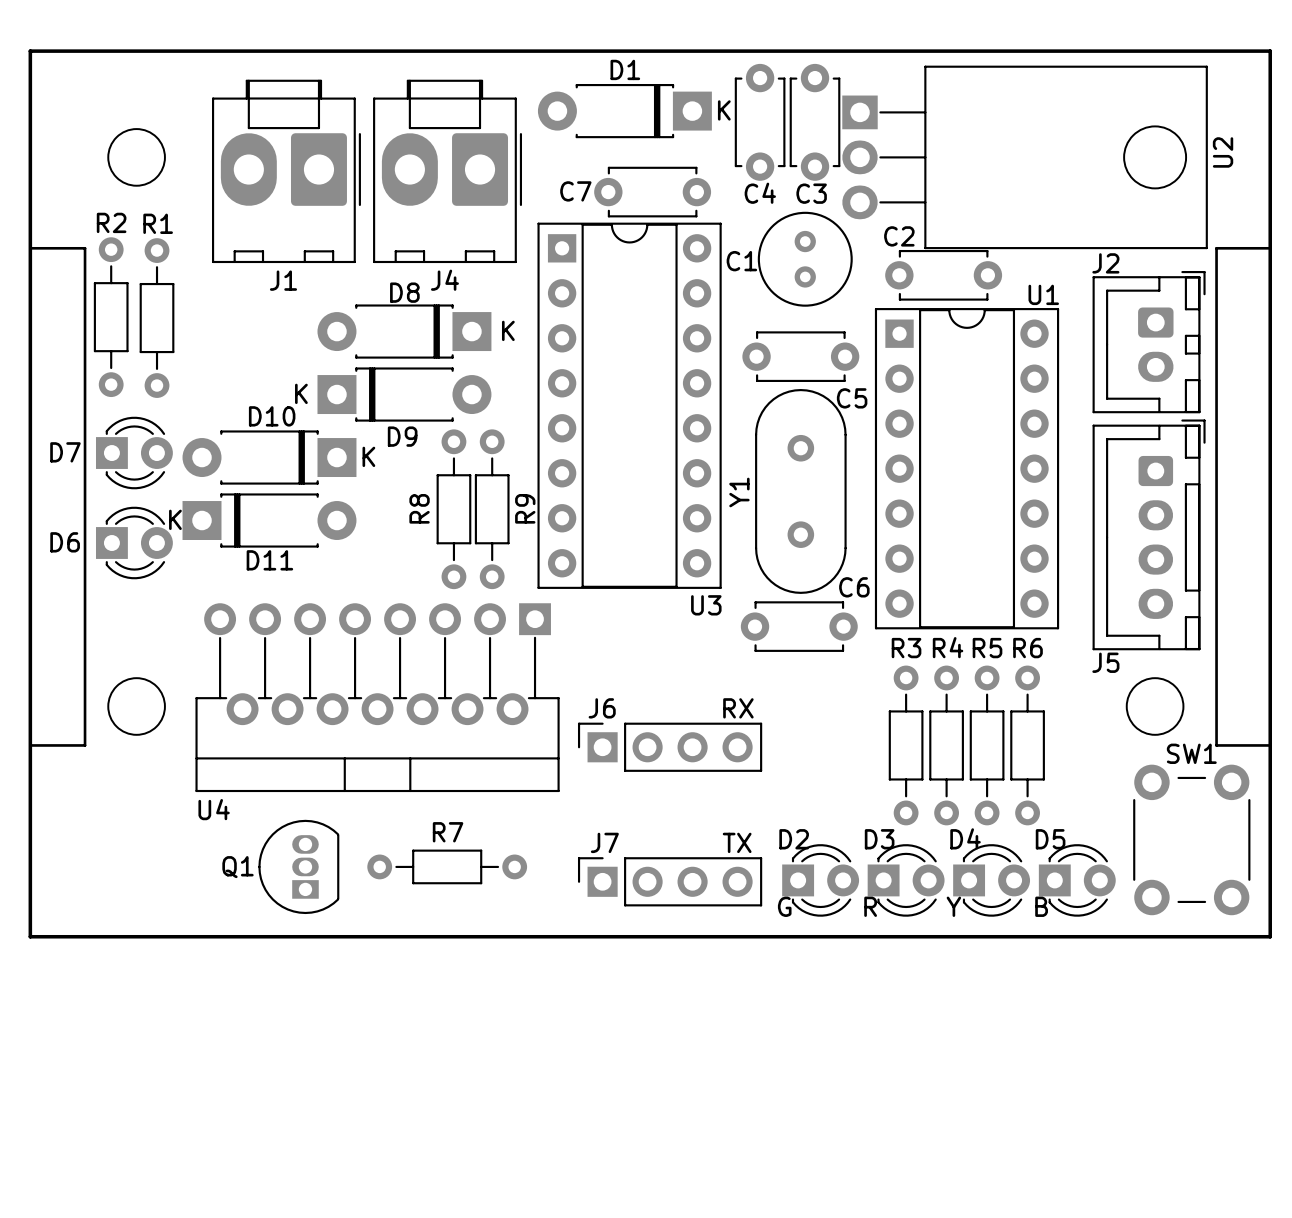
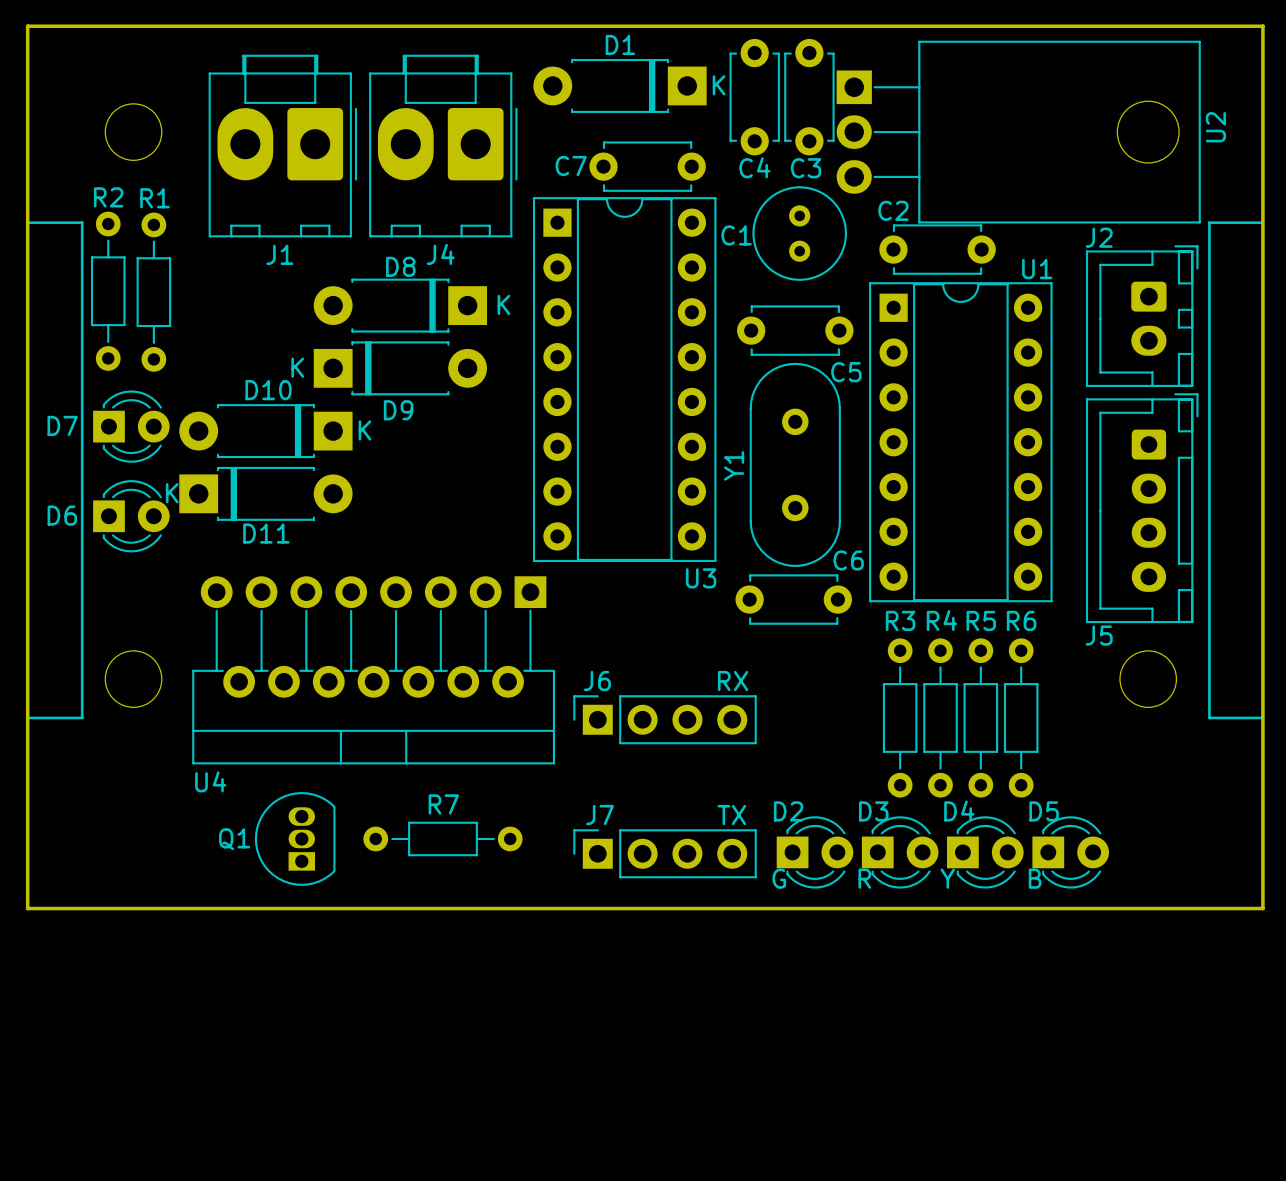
R8: (453, 509) -> none
R9: (492, 509) -> none
SW1: (1191, 839) -> none

